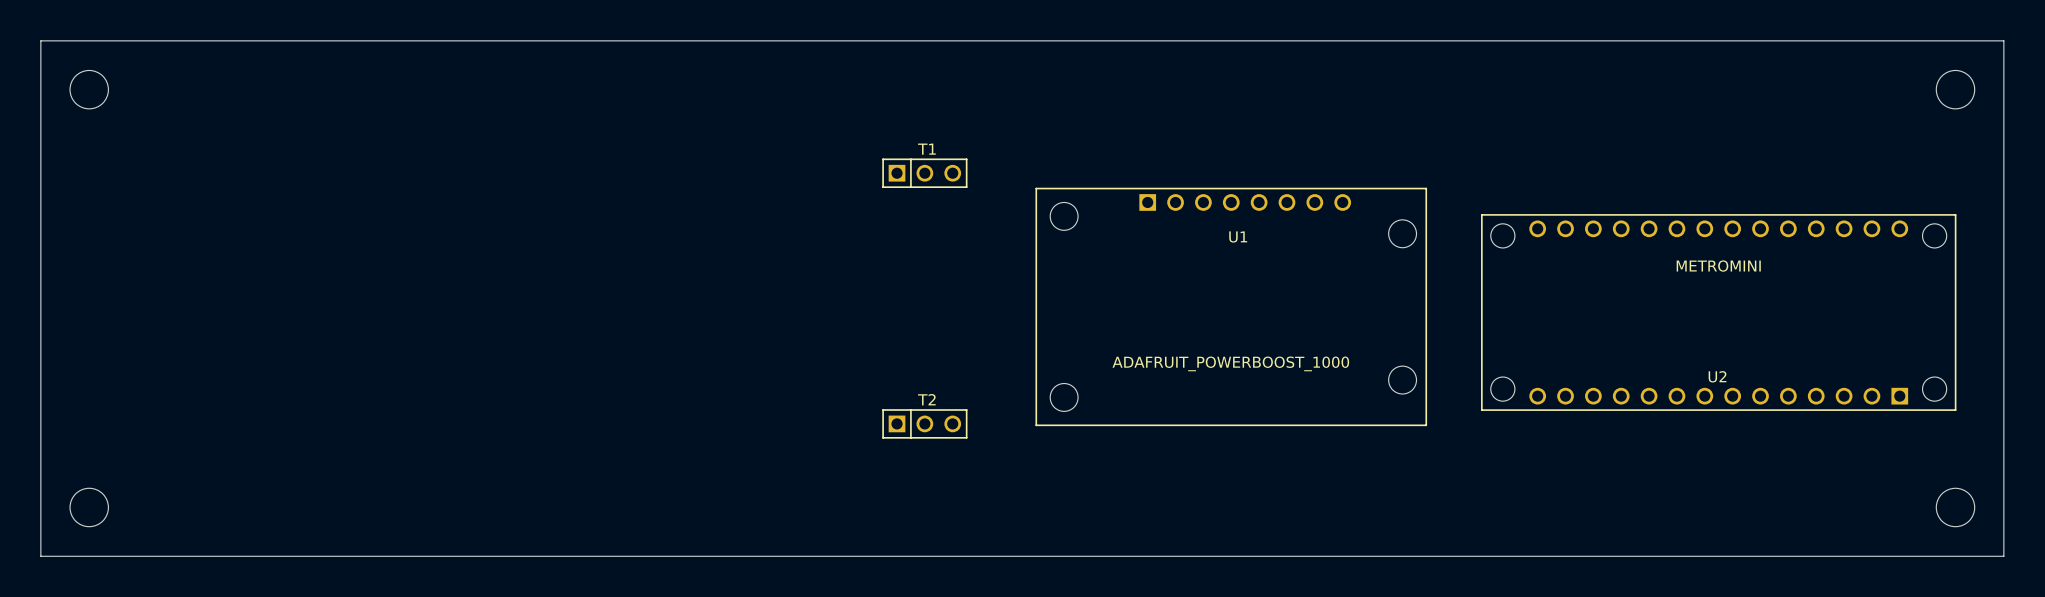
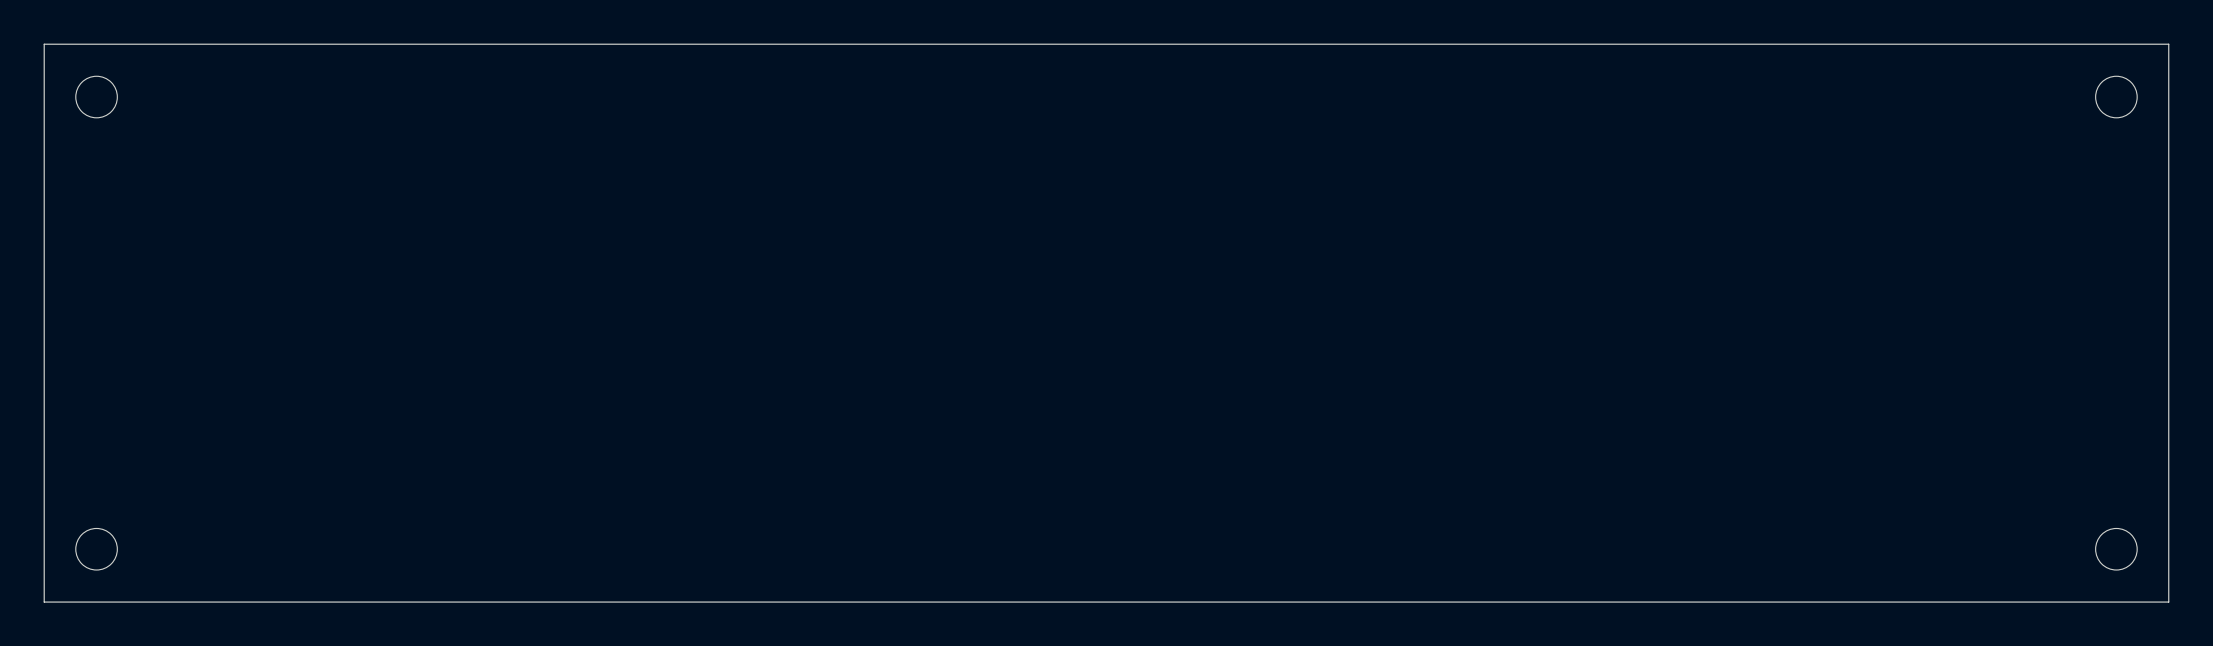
T1: (924, 173) -> none
U1: ADAFRUIT_POWERBOOST_1000 (1231, 306) -> none
U2: METROMINI (1718, 312) -> none
T2: (924, 423) -> none

